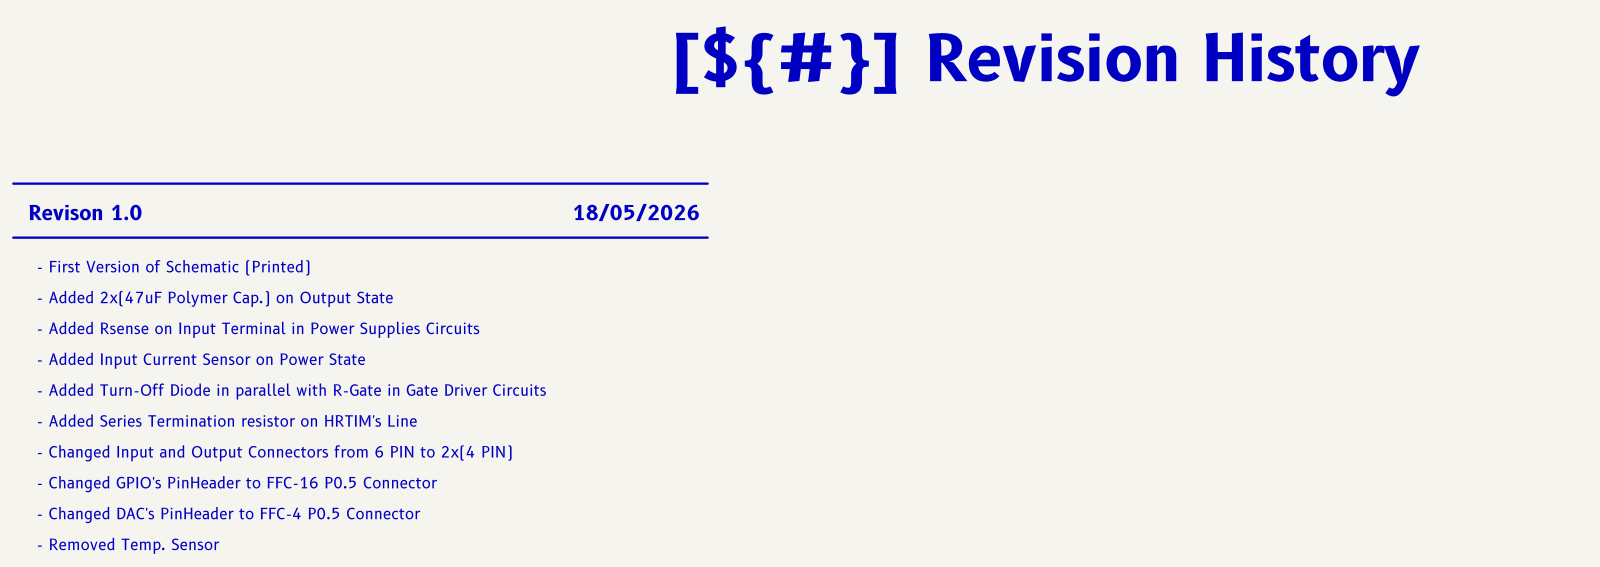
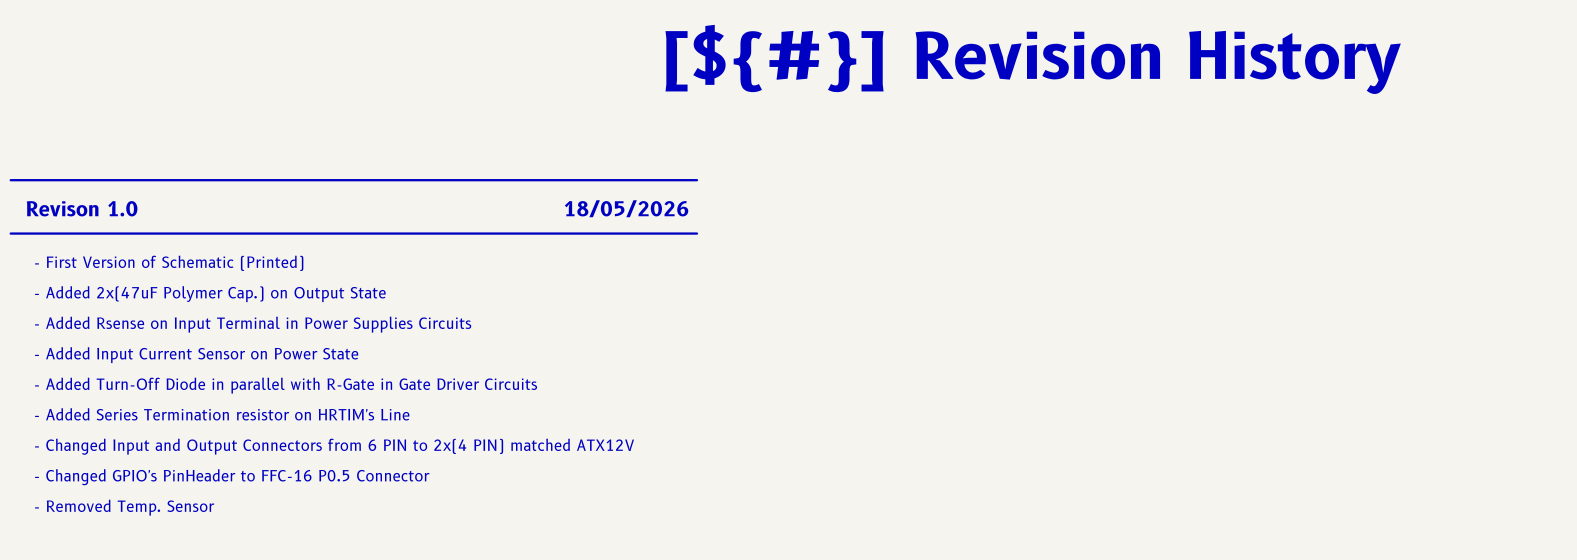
text: - Changed Input and Output Connectors from 6 PIN to 2x(4 PIN) (274, 453) -> - Changed Input and Output Connectors from 6 PIN to 2x(4 PIN) matched ATX12V (334, 446)
text: - Changed DAC's PinHeader to FFC-4 P0.5 Connector (229, 515) -> - Removed Temp. Sensor (124, 507)
text: - Removed Temp. Sensor (128, 545) -> none

